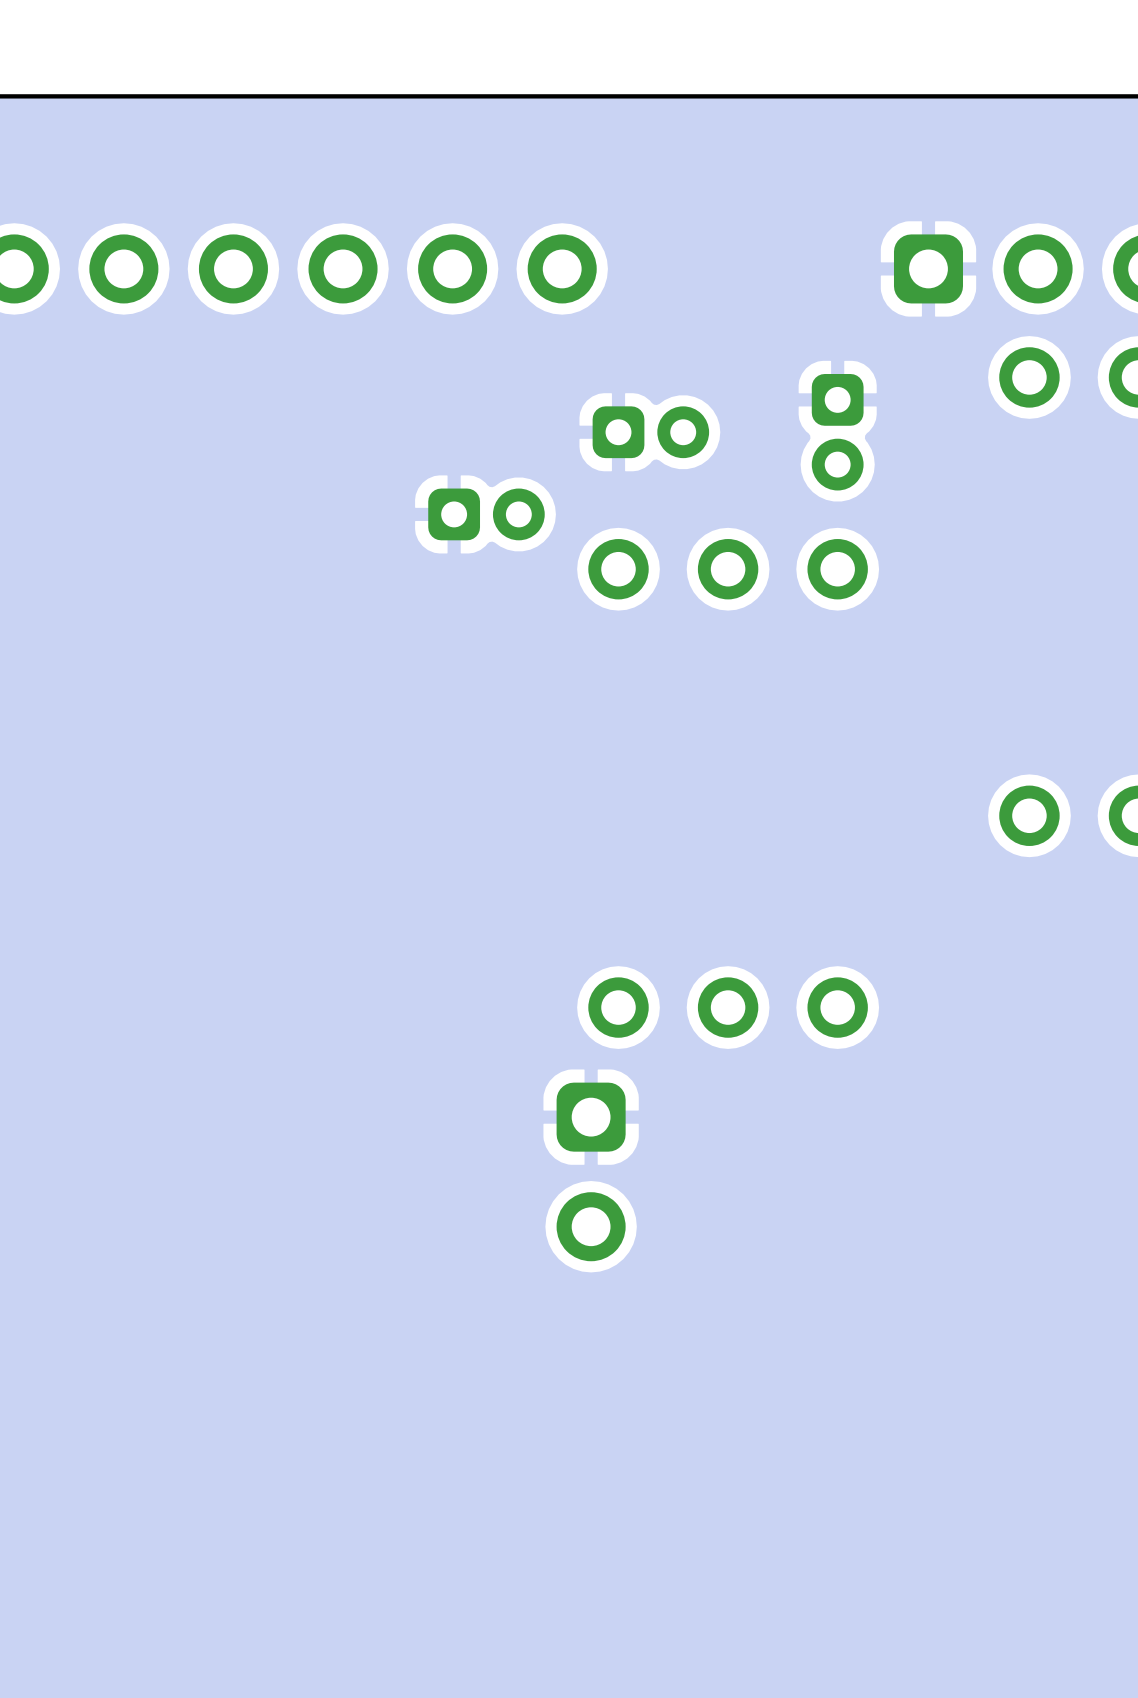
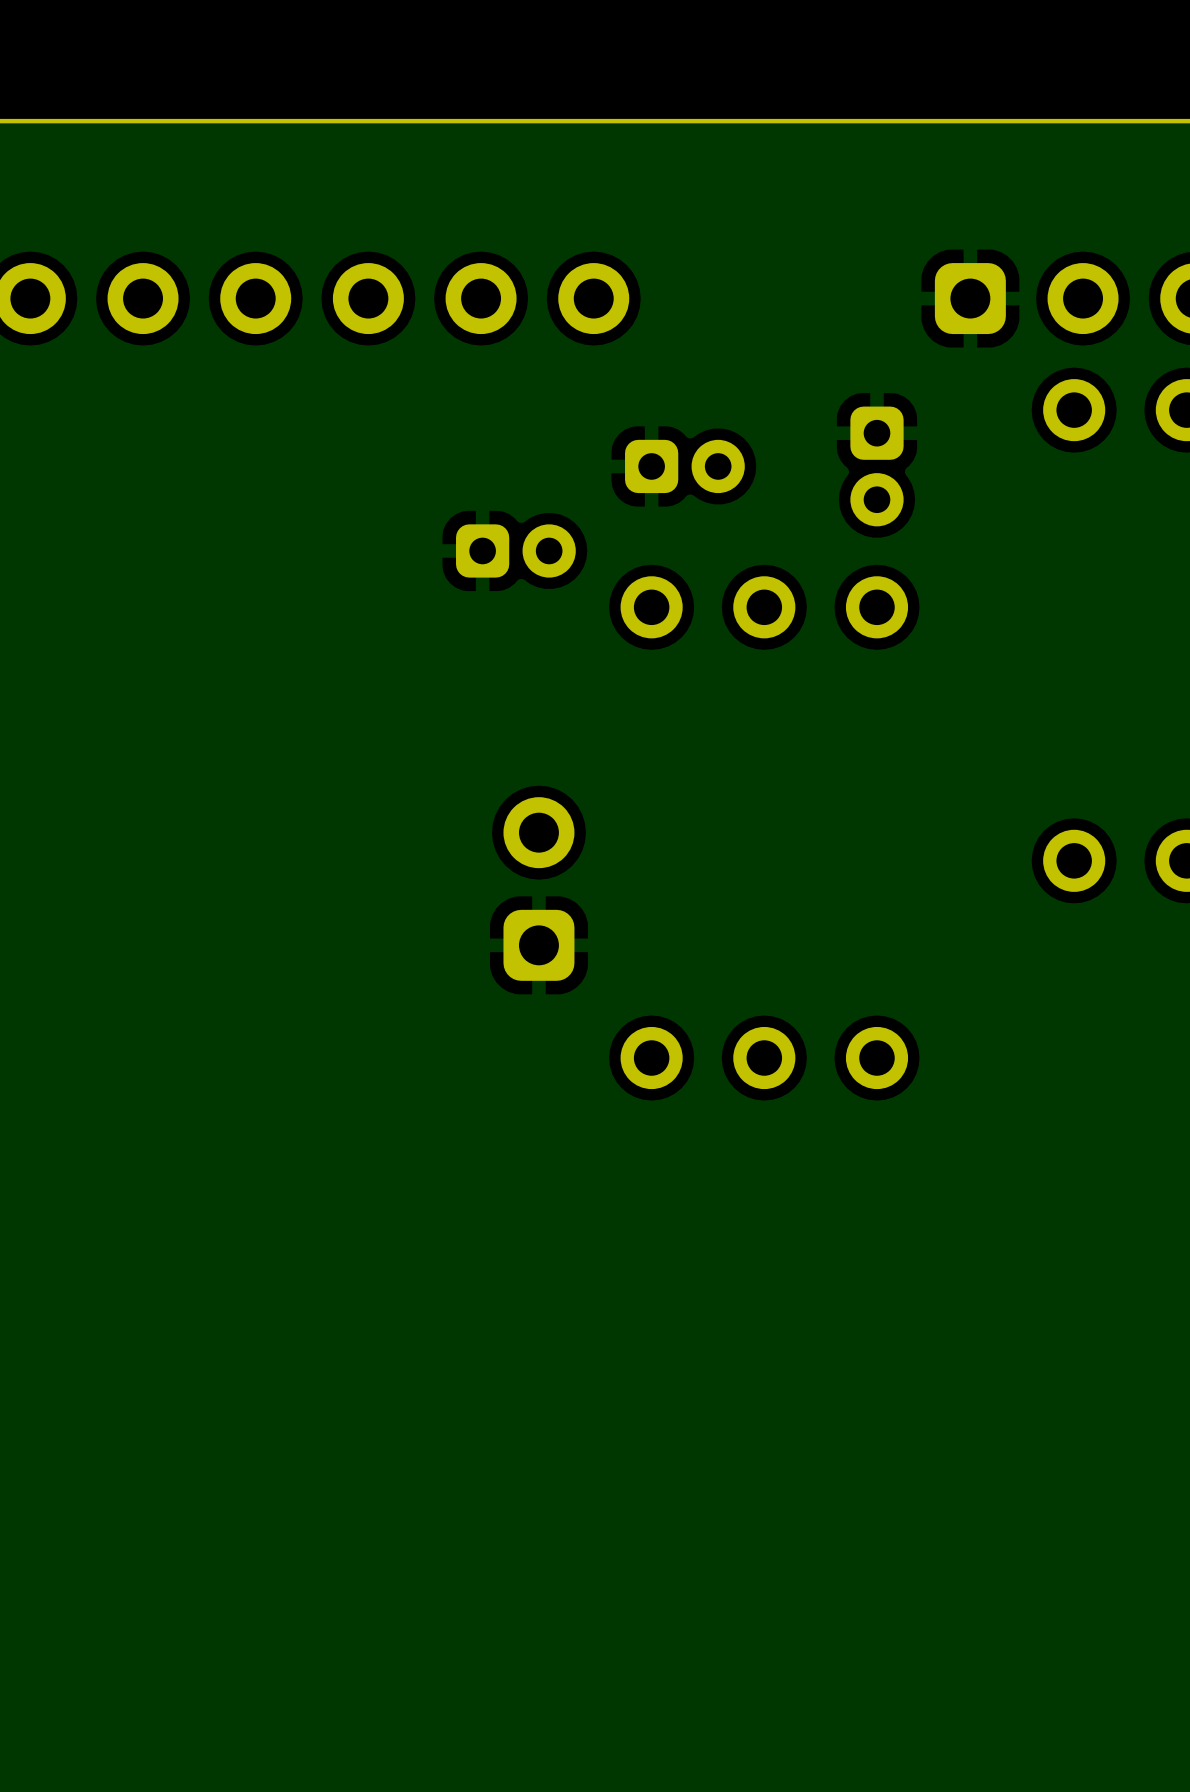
part rotation: 0° (591, 1171) -> 180° (538, 889)
part position: (591, 1171) -> (538, 889)

